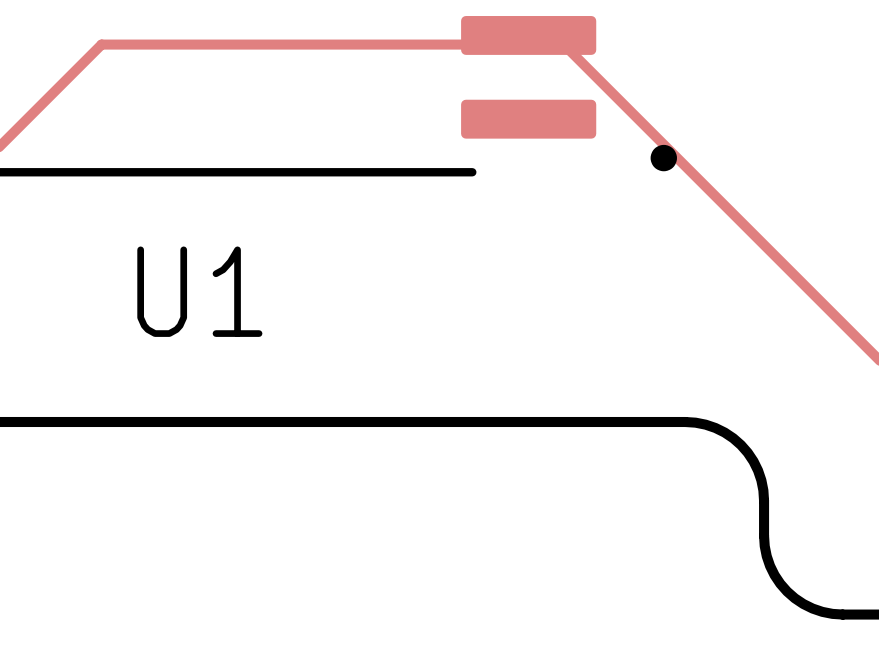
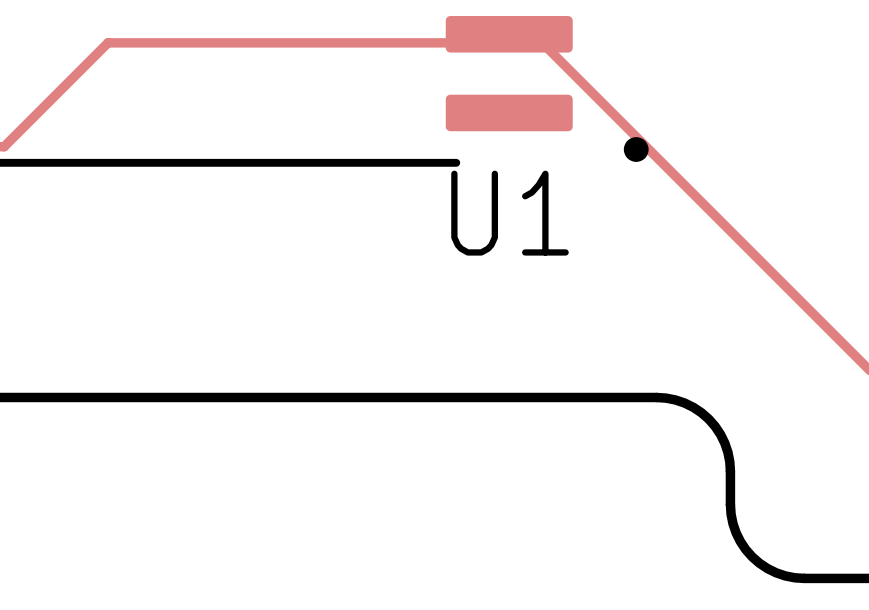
U1 name position: U1 (199, 291) -> U1 (510, 213)

